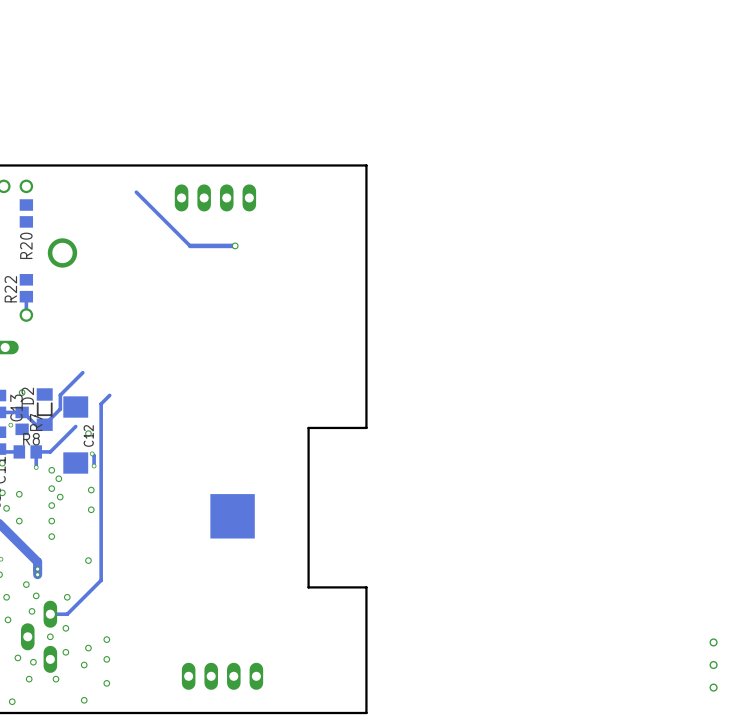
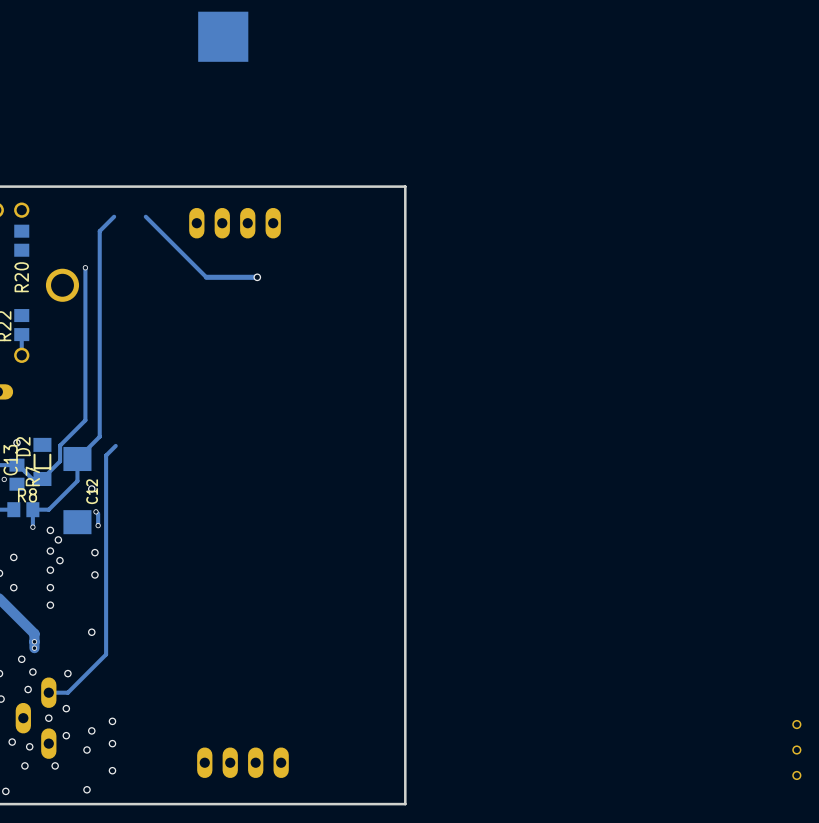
part: none -> (223, 36)
track: none -> (114, 216) (99, 231) (99, 436) (77, 459) (77, 481)
track: none -> (85, 267) (85, 420)
via: none -> (85, 267)
board edge: (366, 427) (308, 427) (308, 587) (366, 587) -> (405, 482) (405, 662)
part: (232, 516) -> none

